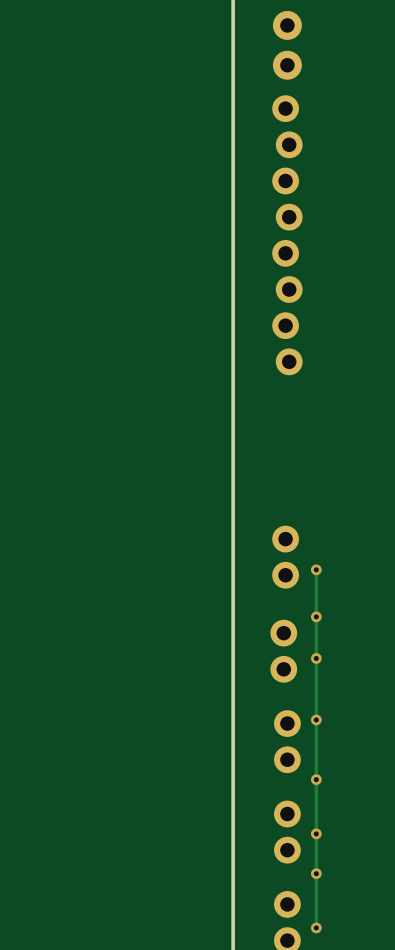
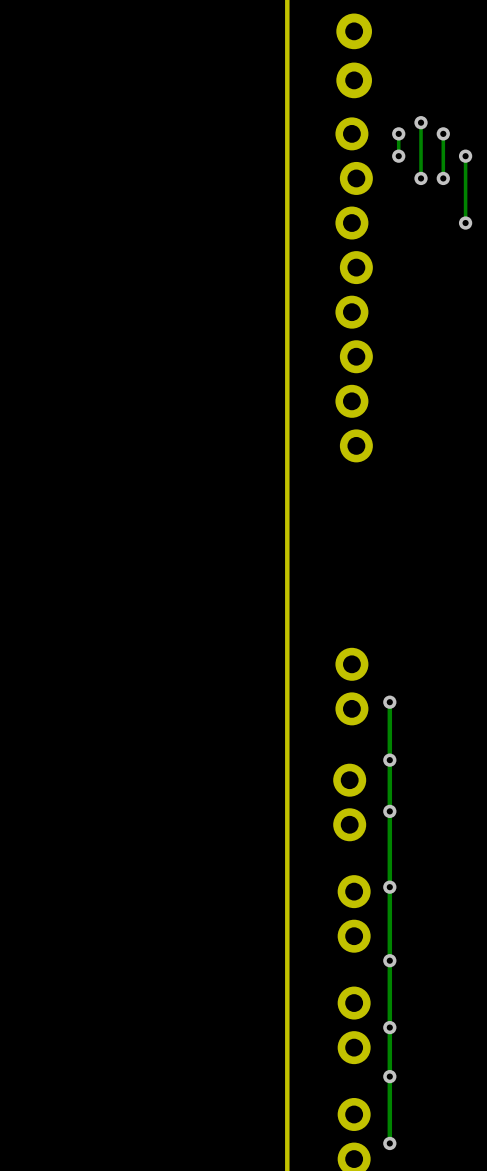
track: none -> (421, 122) (421, 178)
via: none -> (421, 122)
track: none -> (398, 133) (398, 156)
via: none -> (398, 133)
track: none -> (443, 133) (443, 178)
via: none -> (443, 133)
via: none -> (398, 156)
track: none -> (465, 156) (465, 223)
via: none -> (465, 156)
via: none -> (421, 178)
via: none -> (443, 178)
via: none -> (465, 223)

